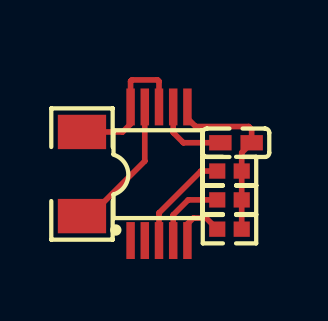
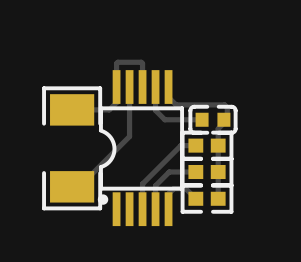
part footprint: [200, 126, 272, 160] -> [188, 104, 238, 135]

